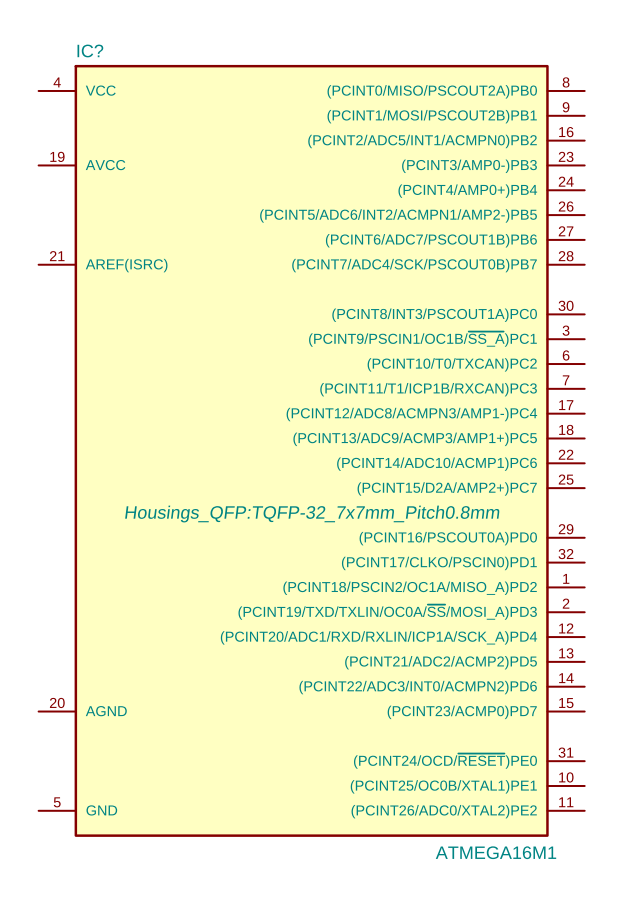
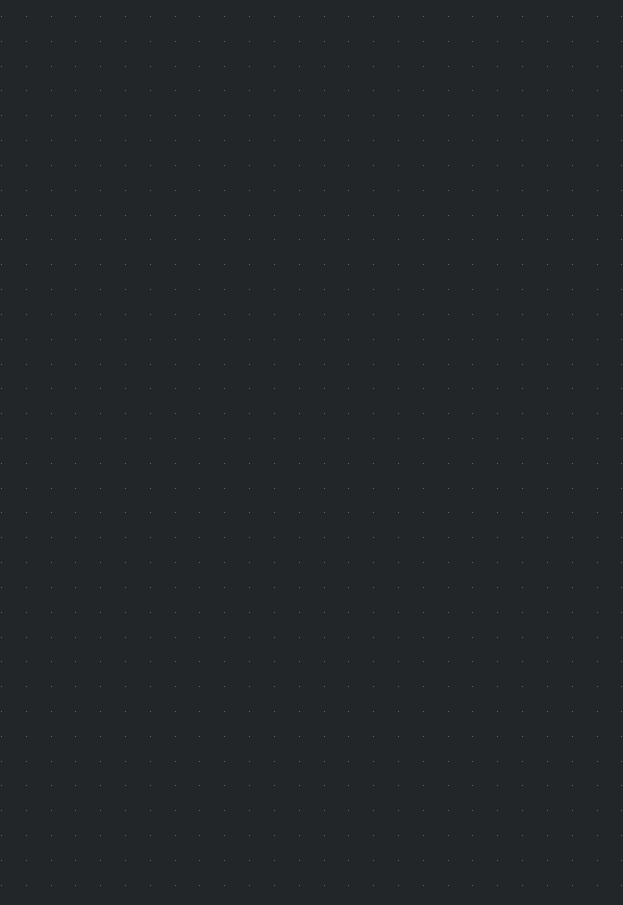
IC?: ATMEGA16M1 (311, 450) -> none

